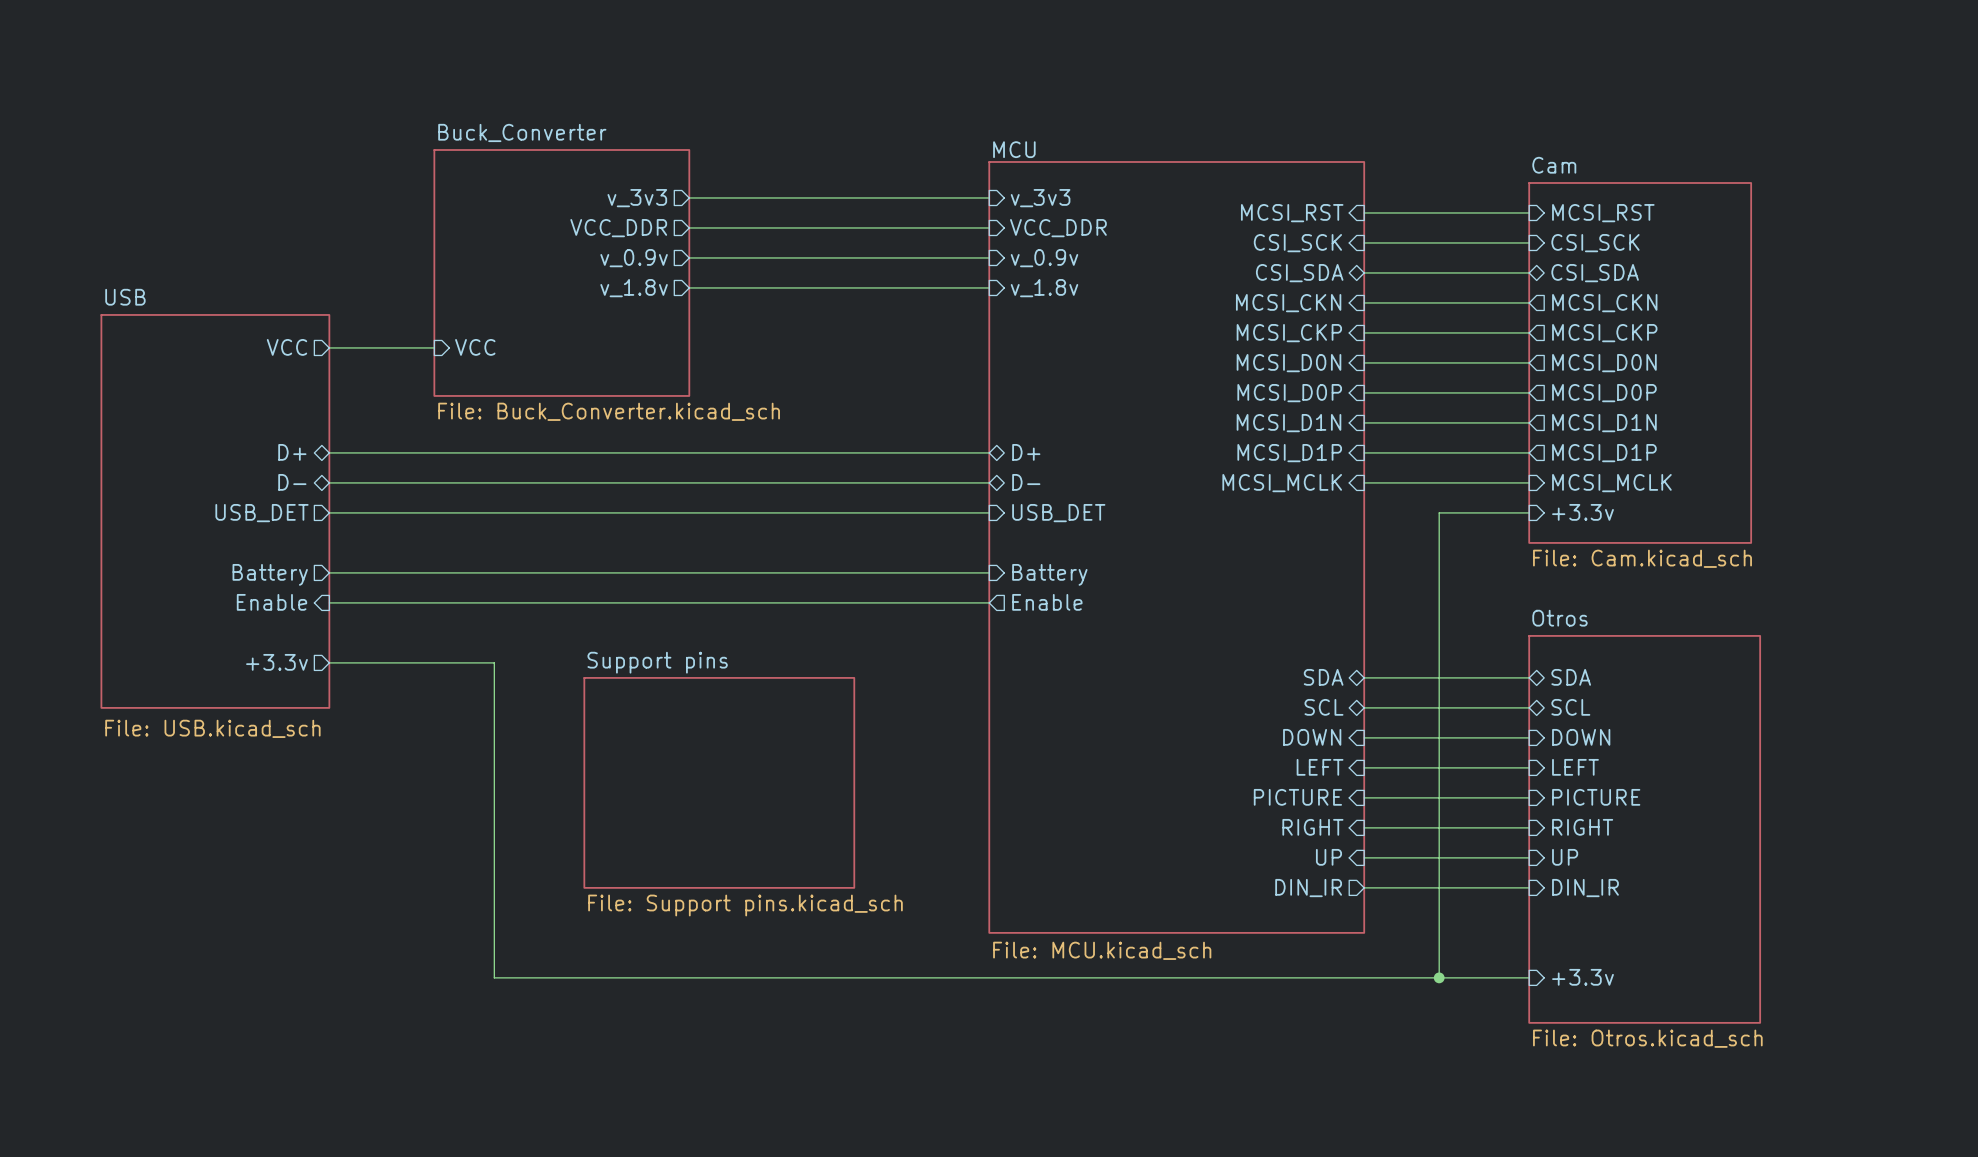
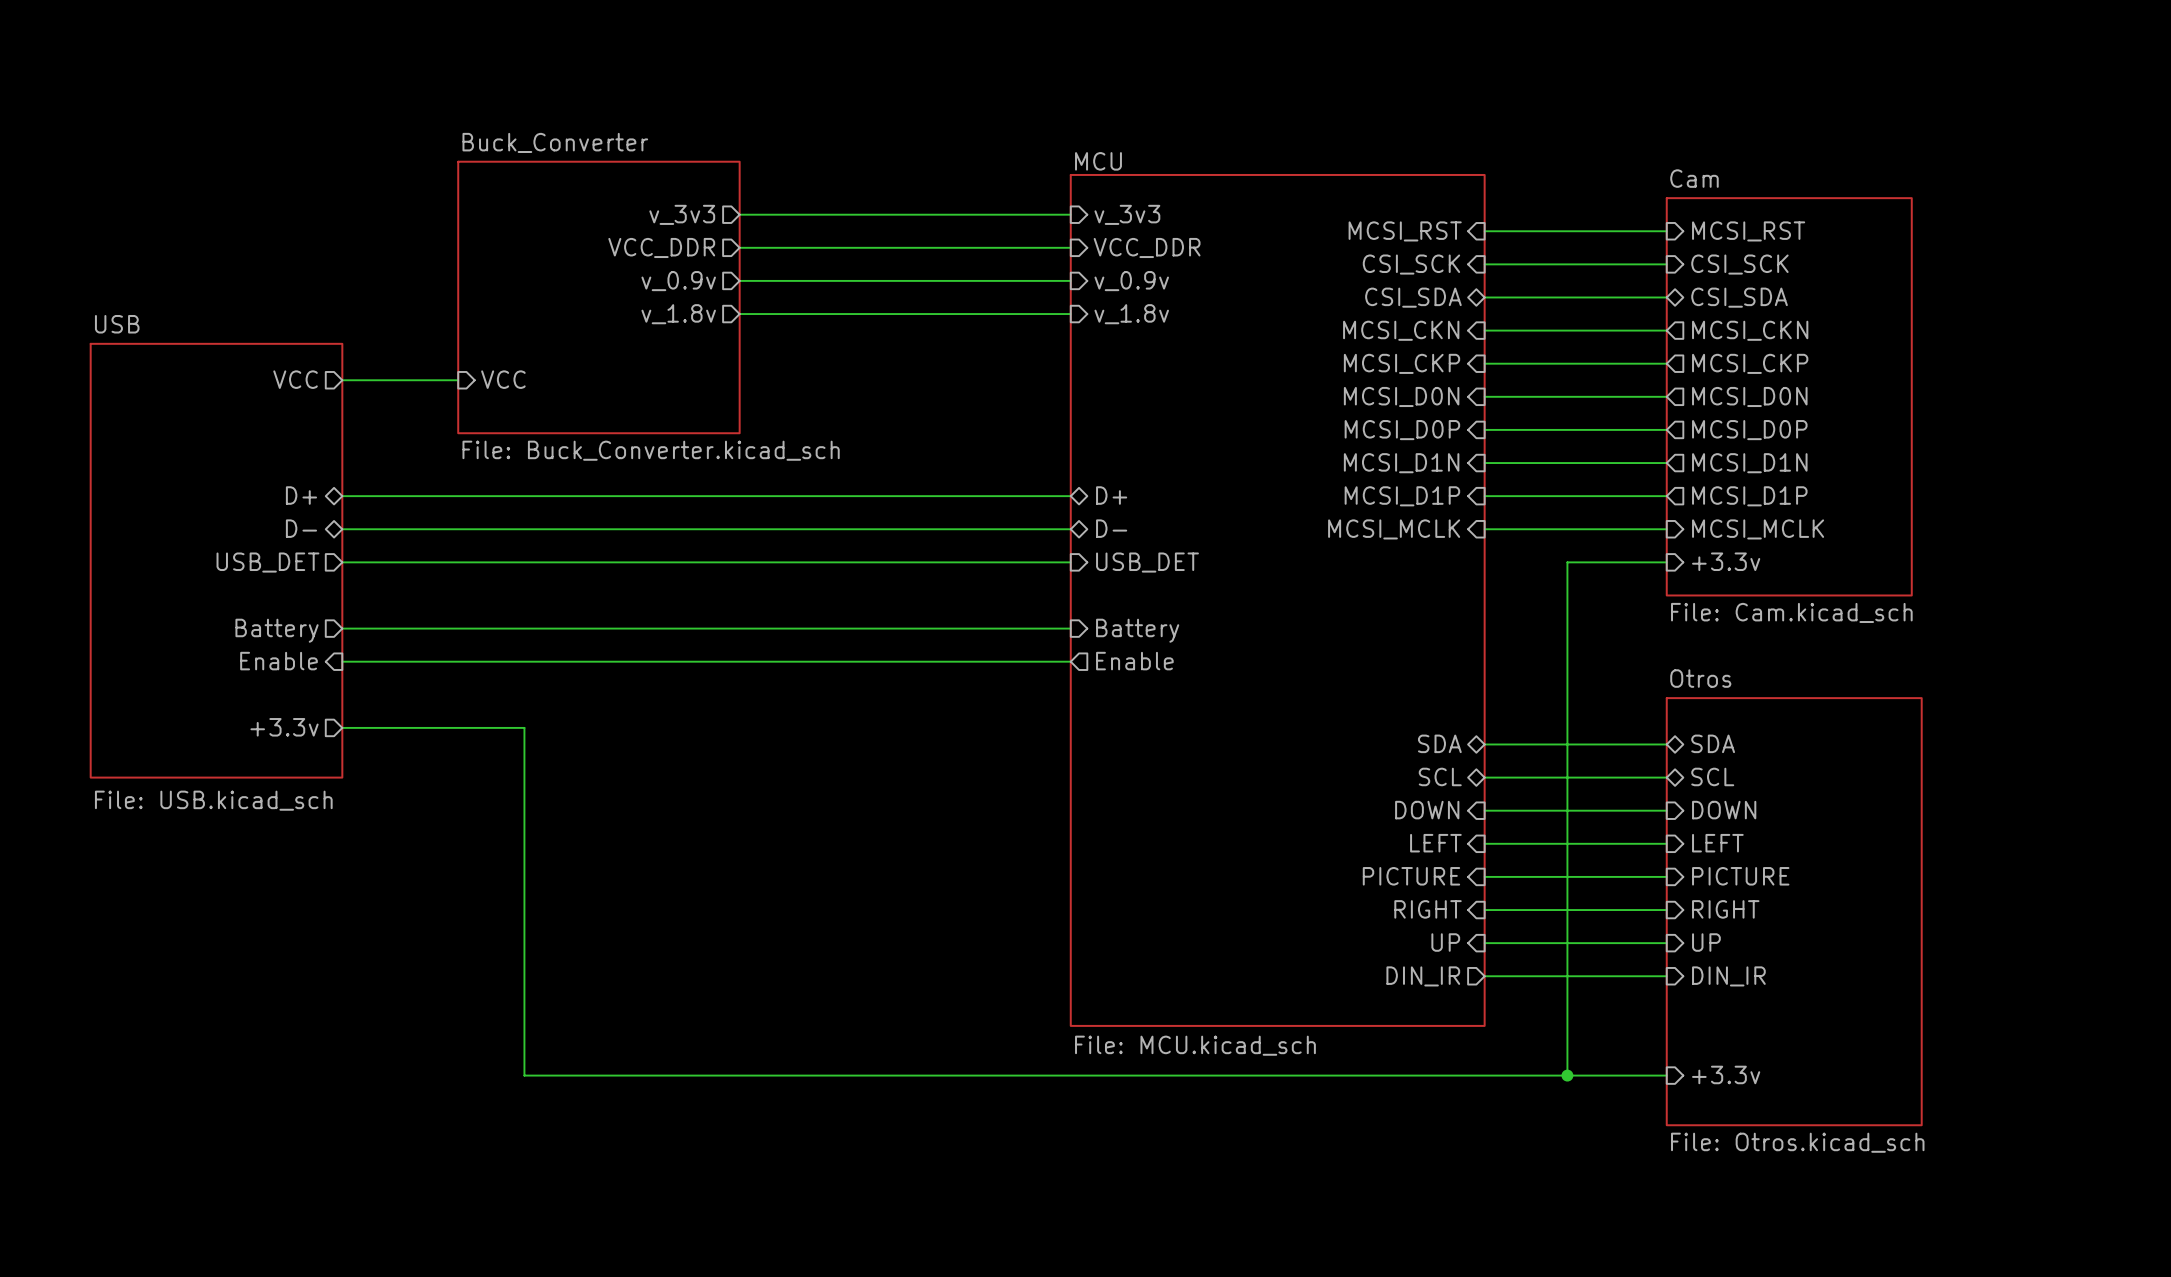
sheet Support pins: File: Support pins.kicad_sch (719, 782) -> none

